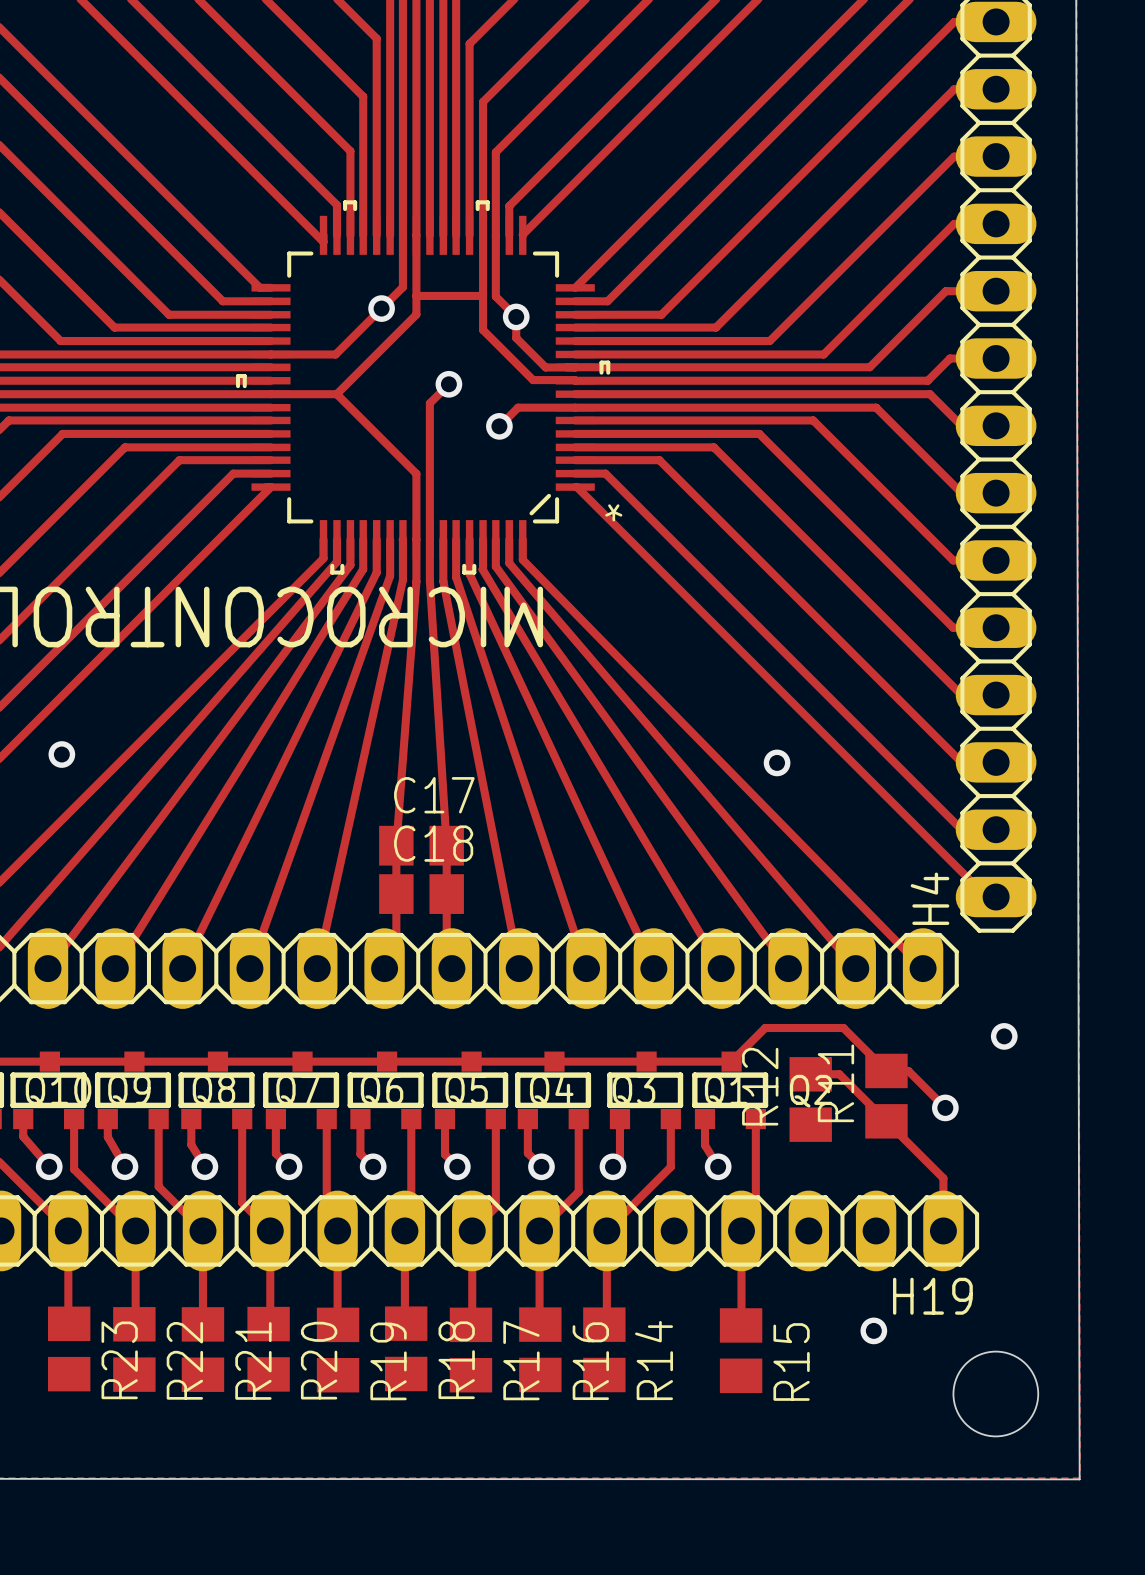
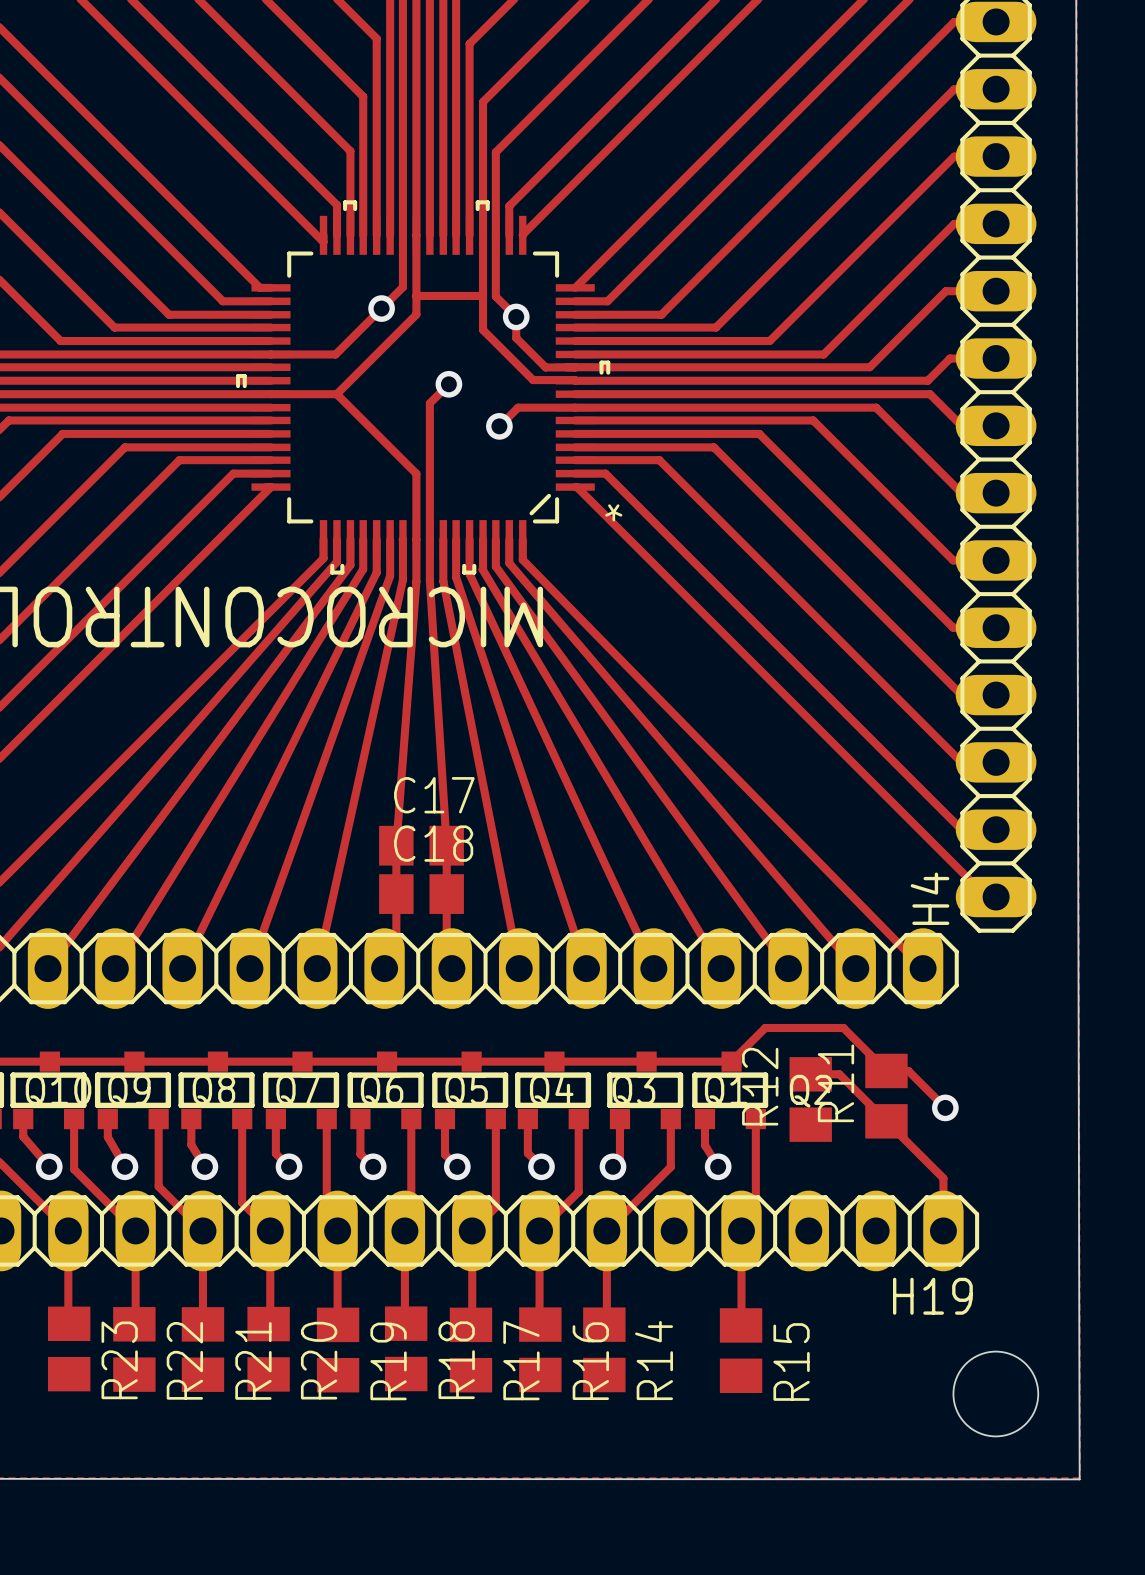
via: (61, 754) -> none
via: (777, 762) -> none
via: (1004, 1036) -> none
via: (873, 1330) -> none

